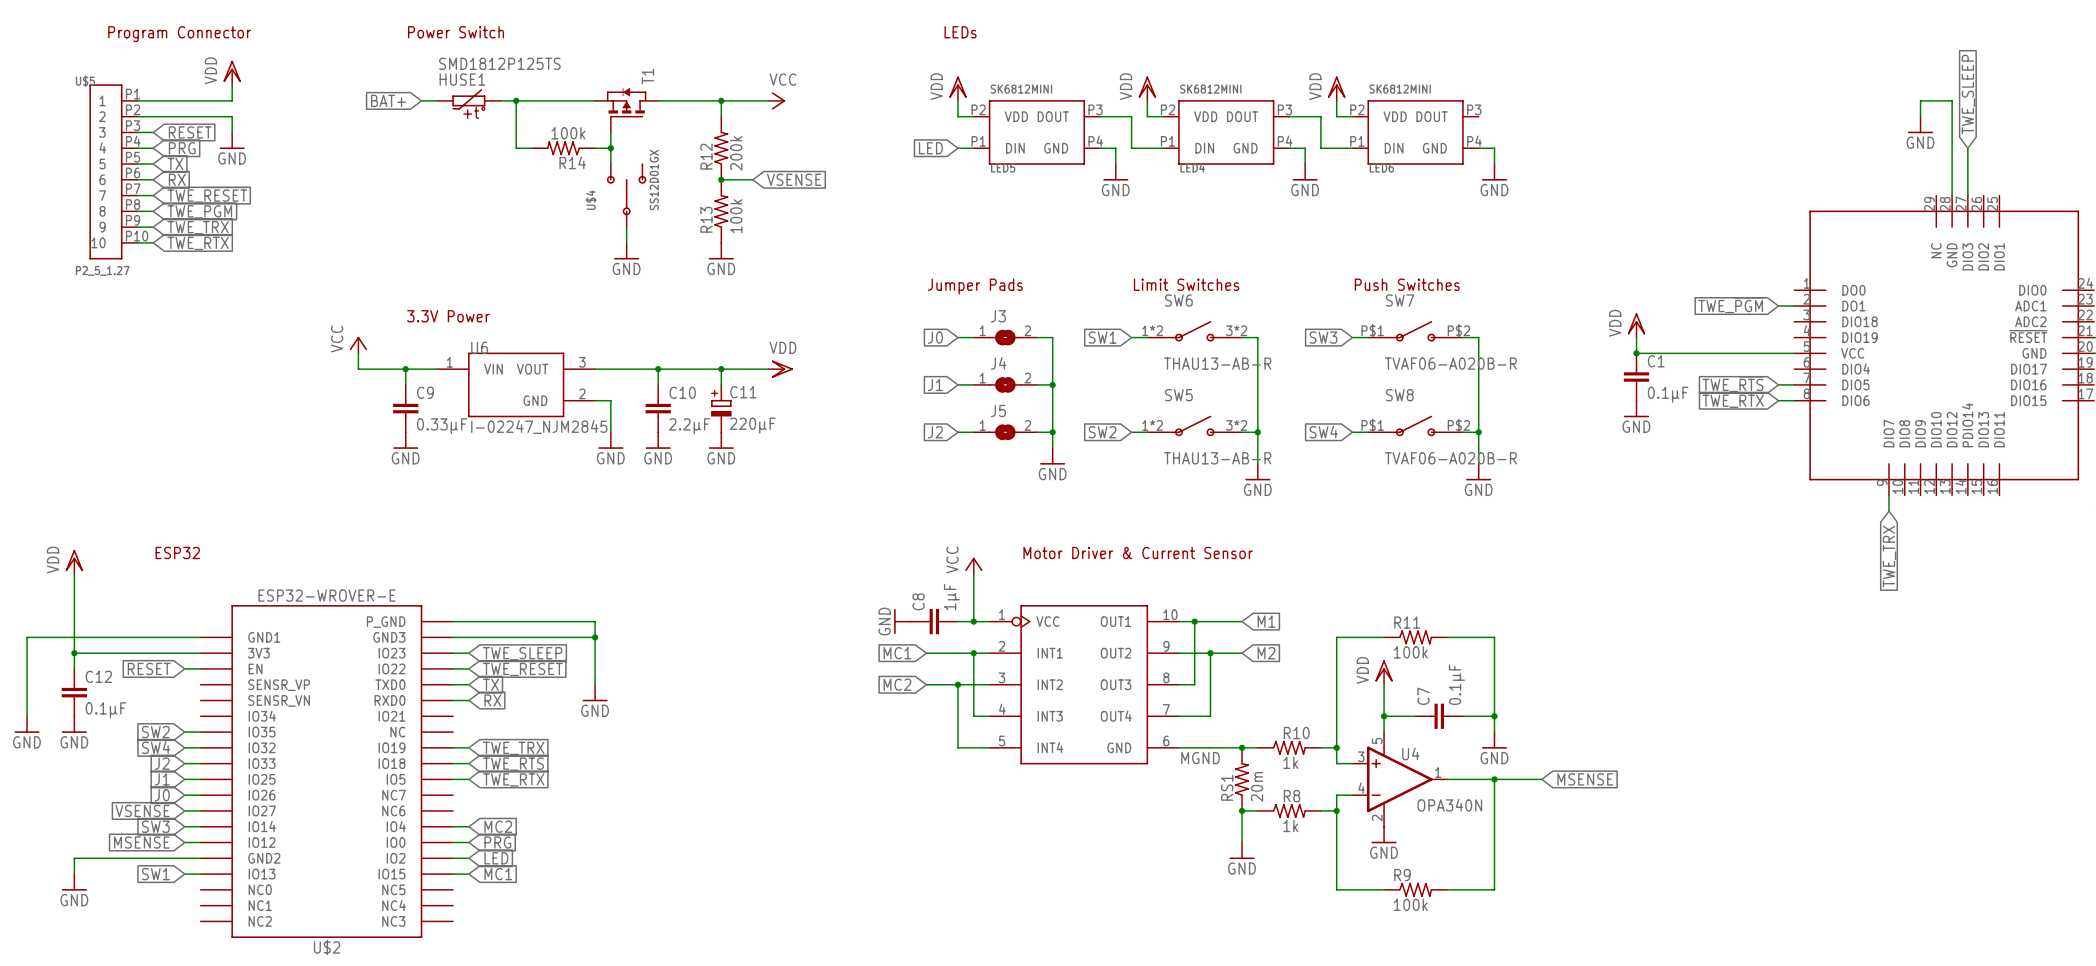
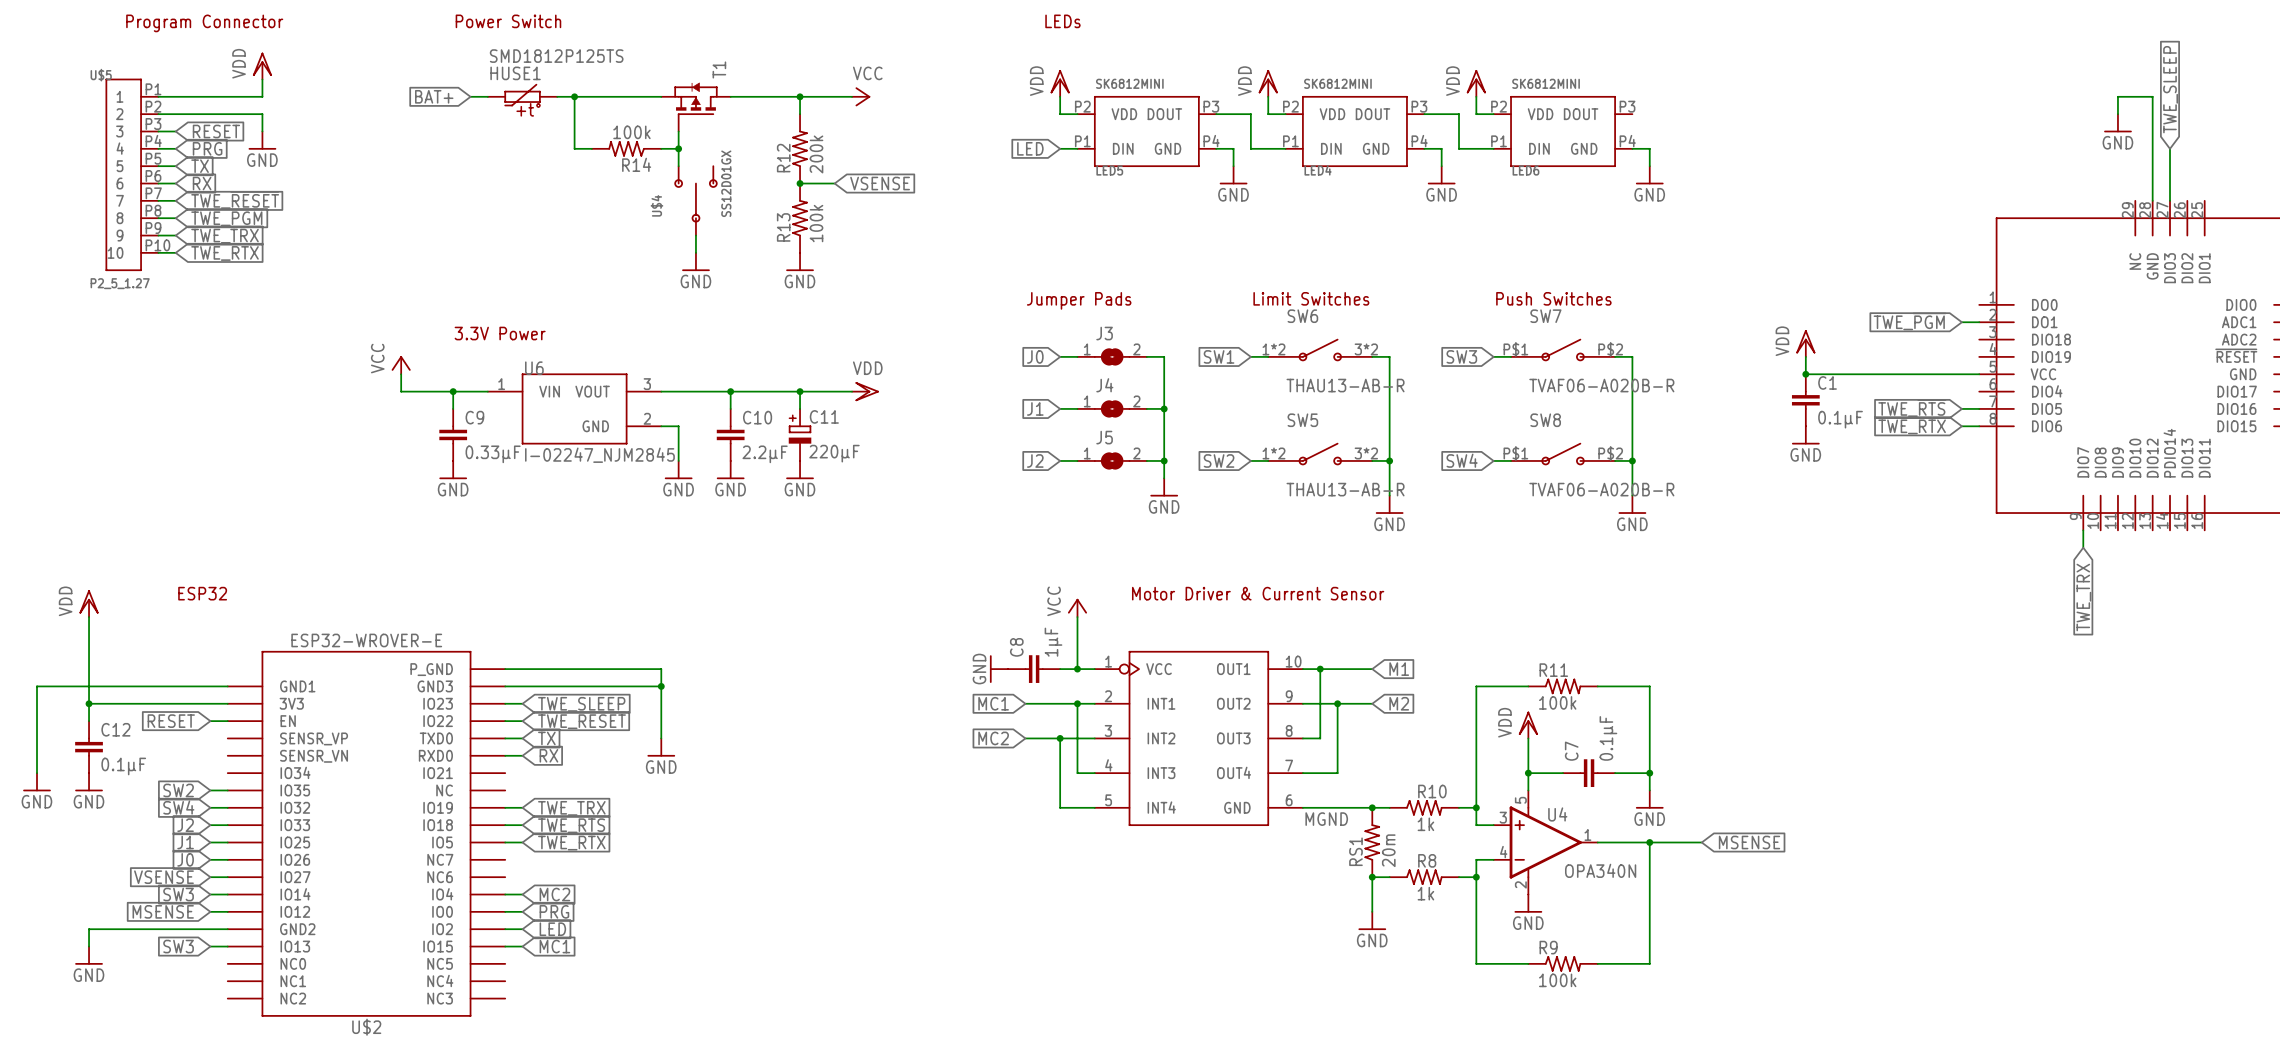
global label: SW1 (155, 874) -> SW3 (178, 946)

